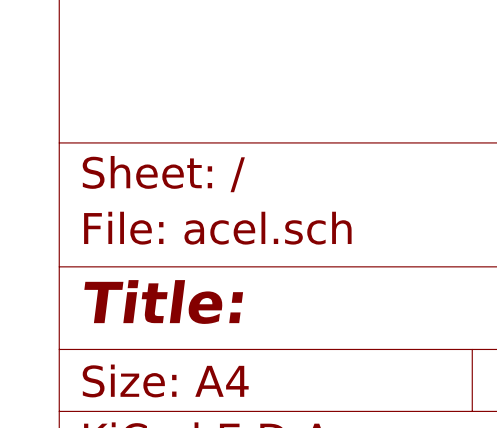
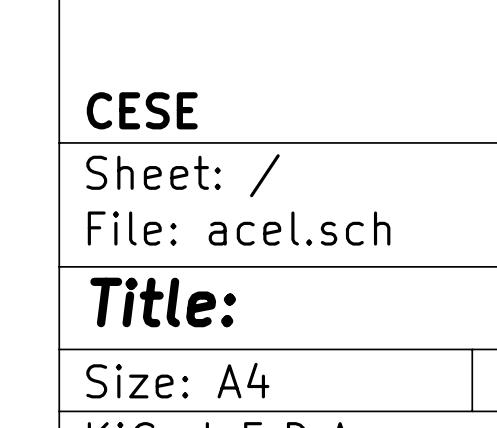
title block: none -> CESE (142, 110)

